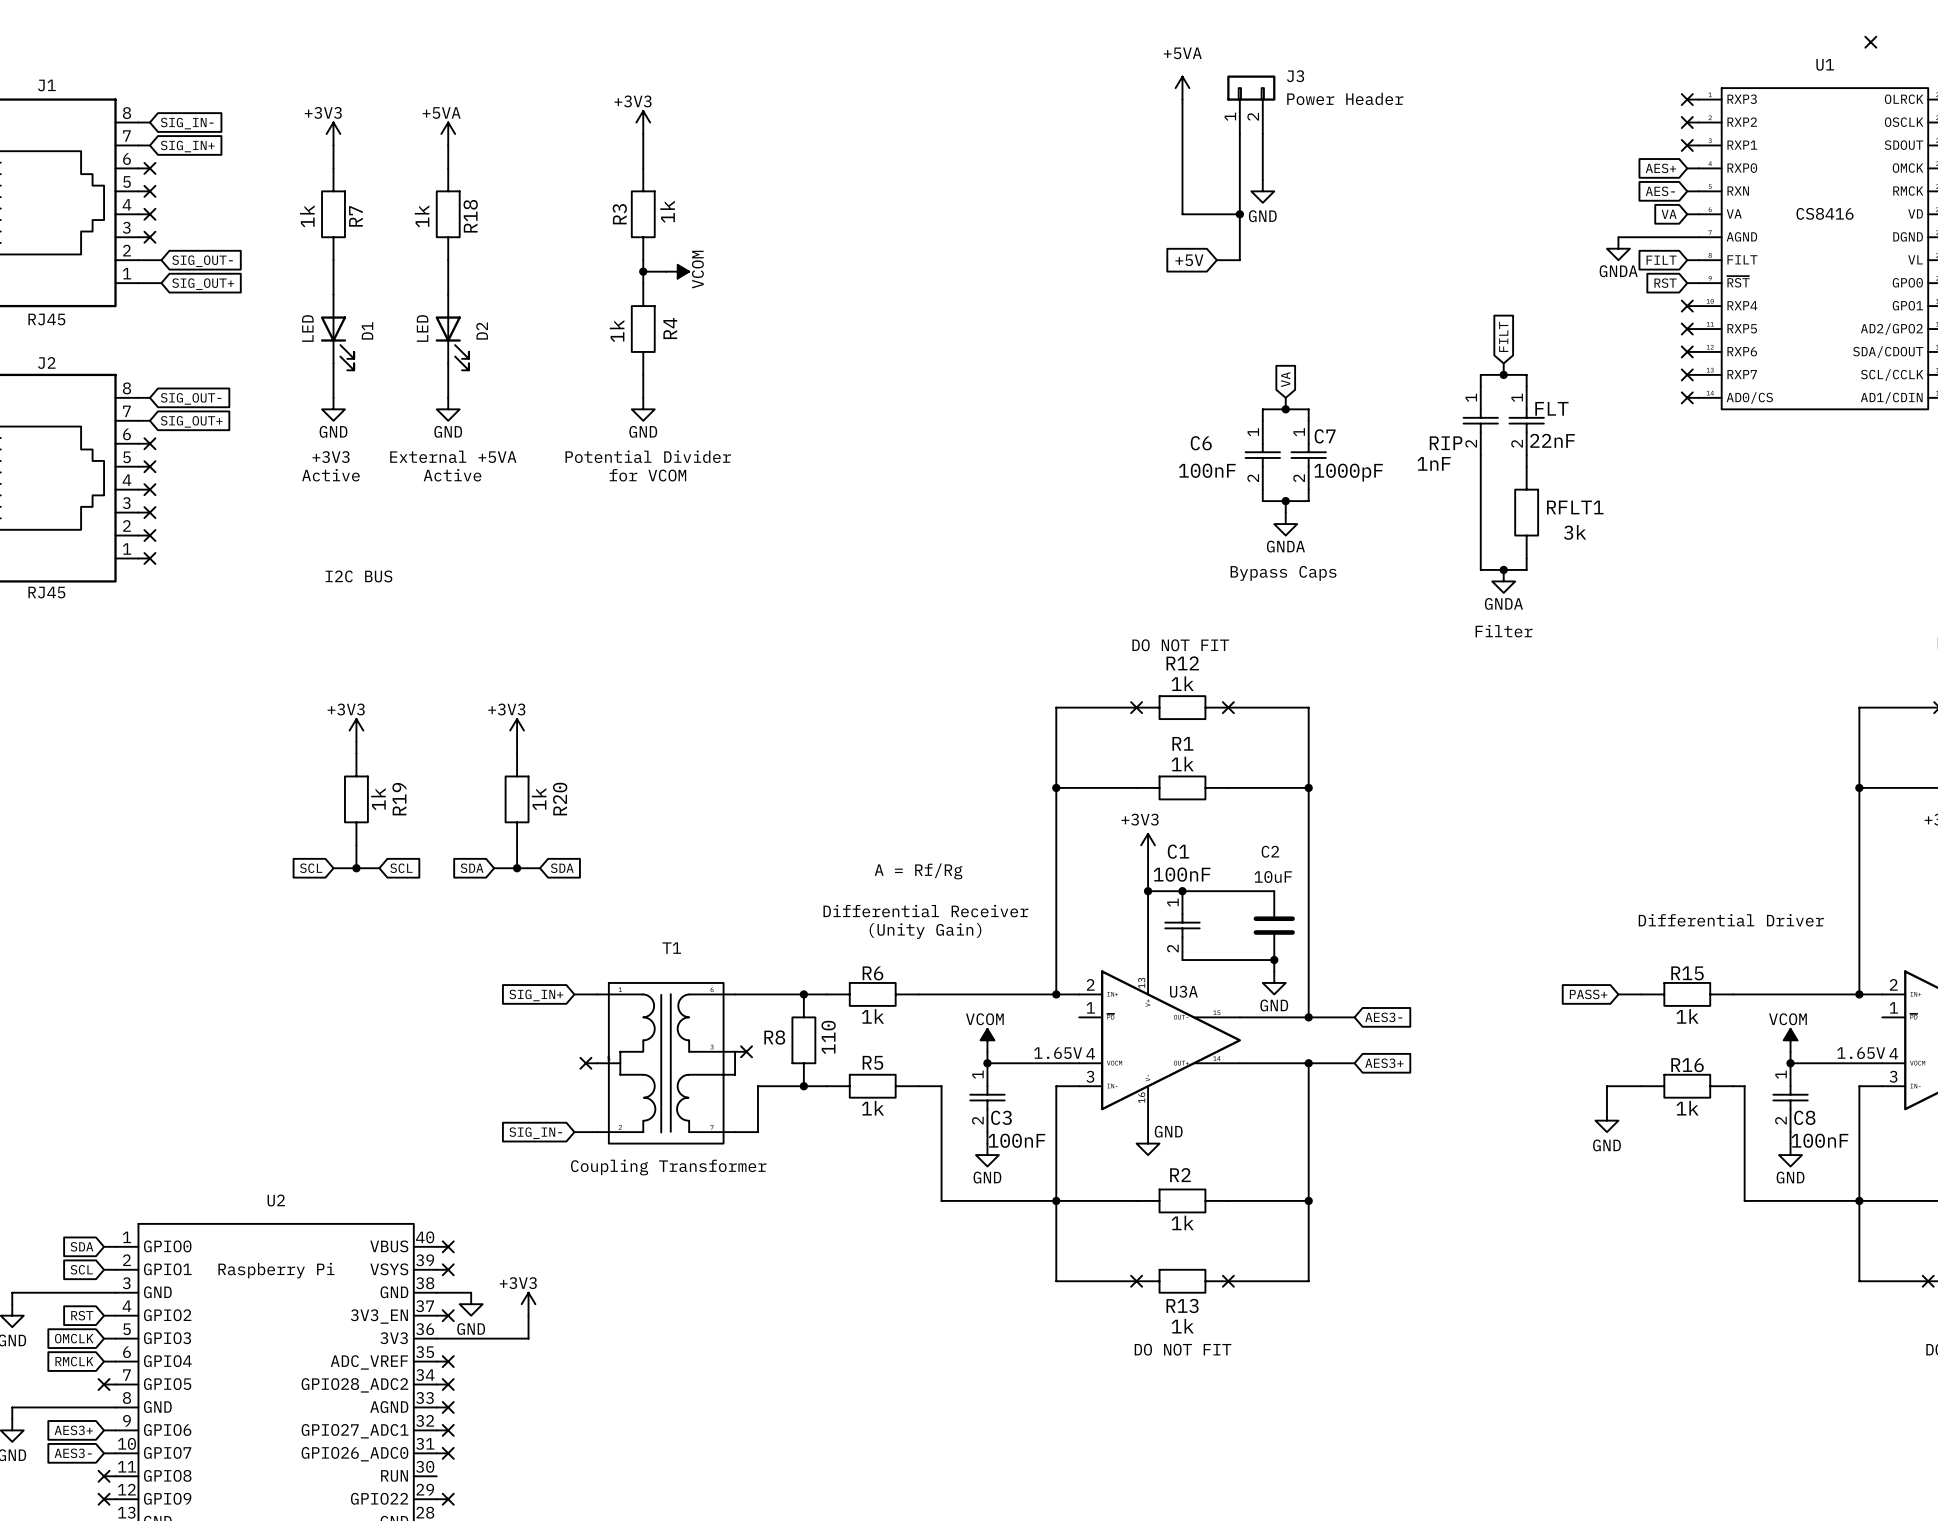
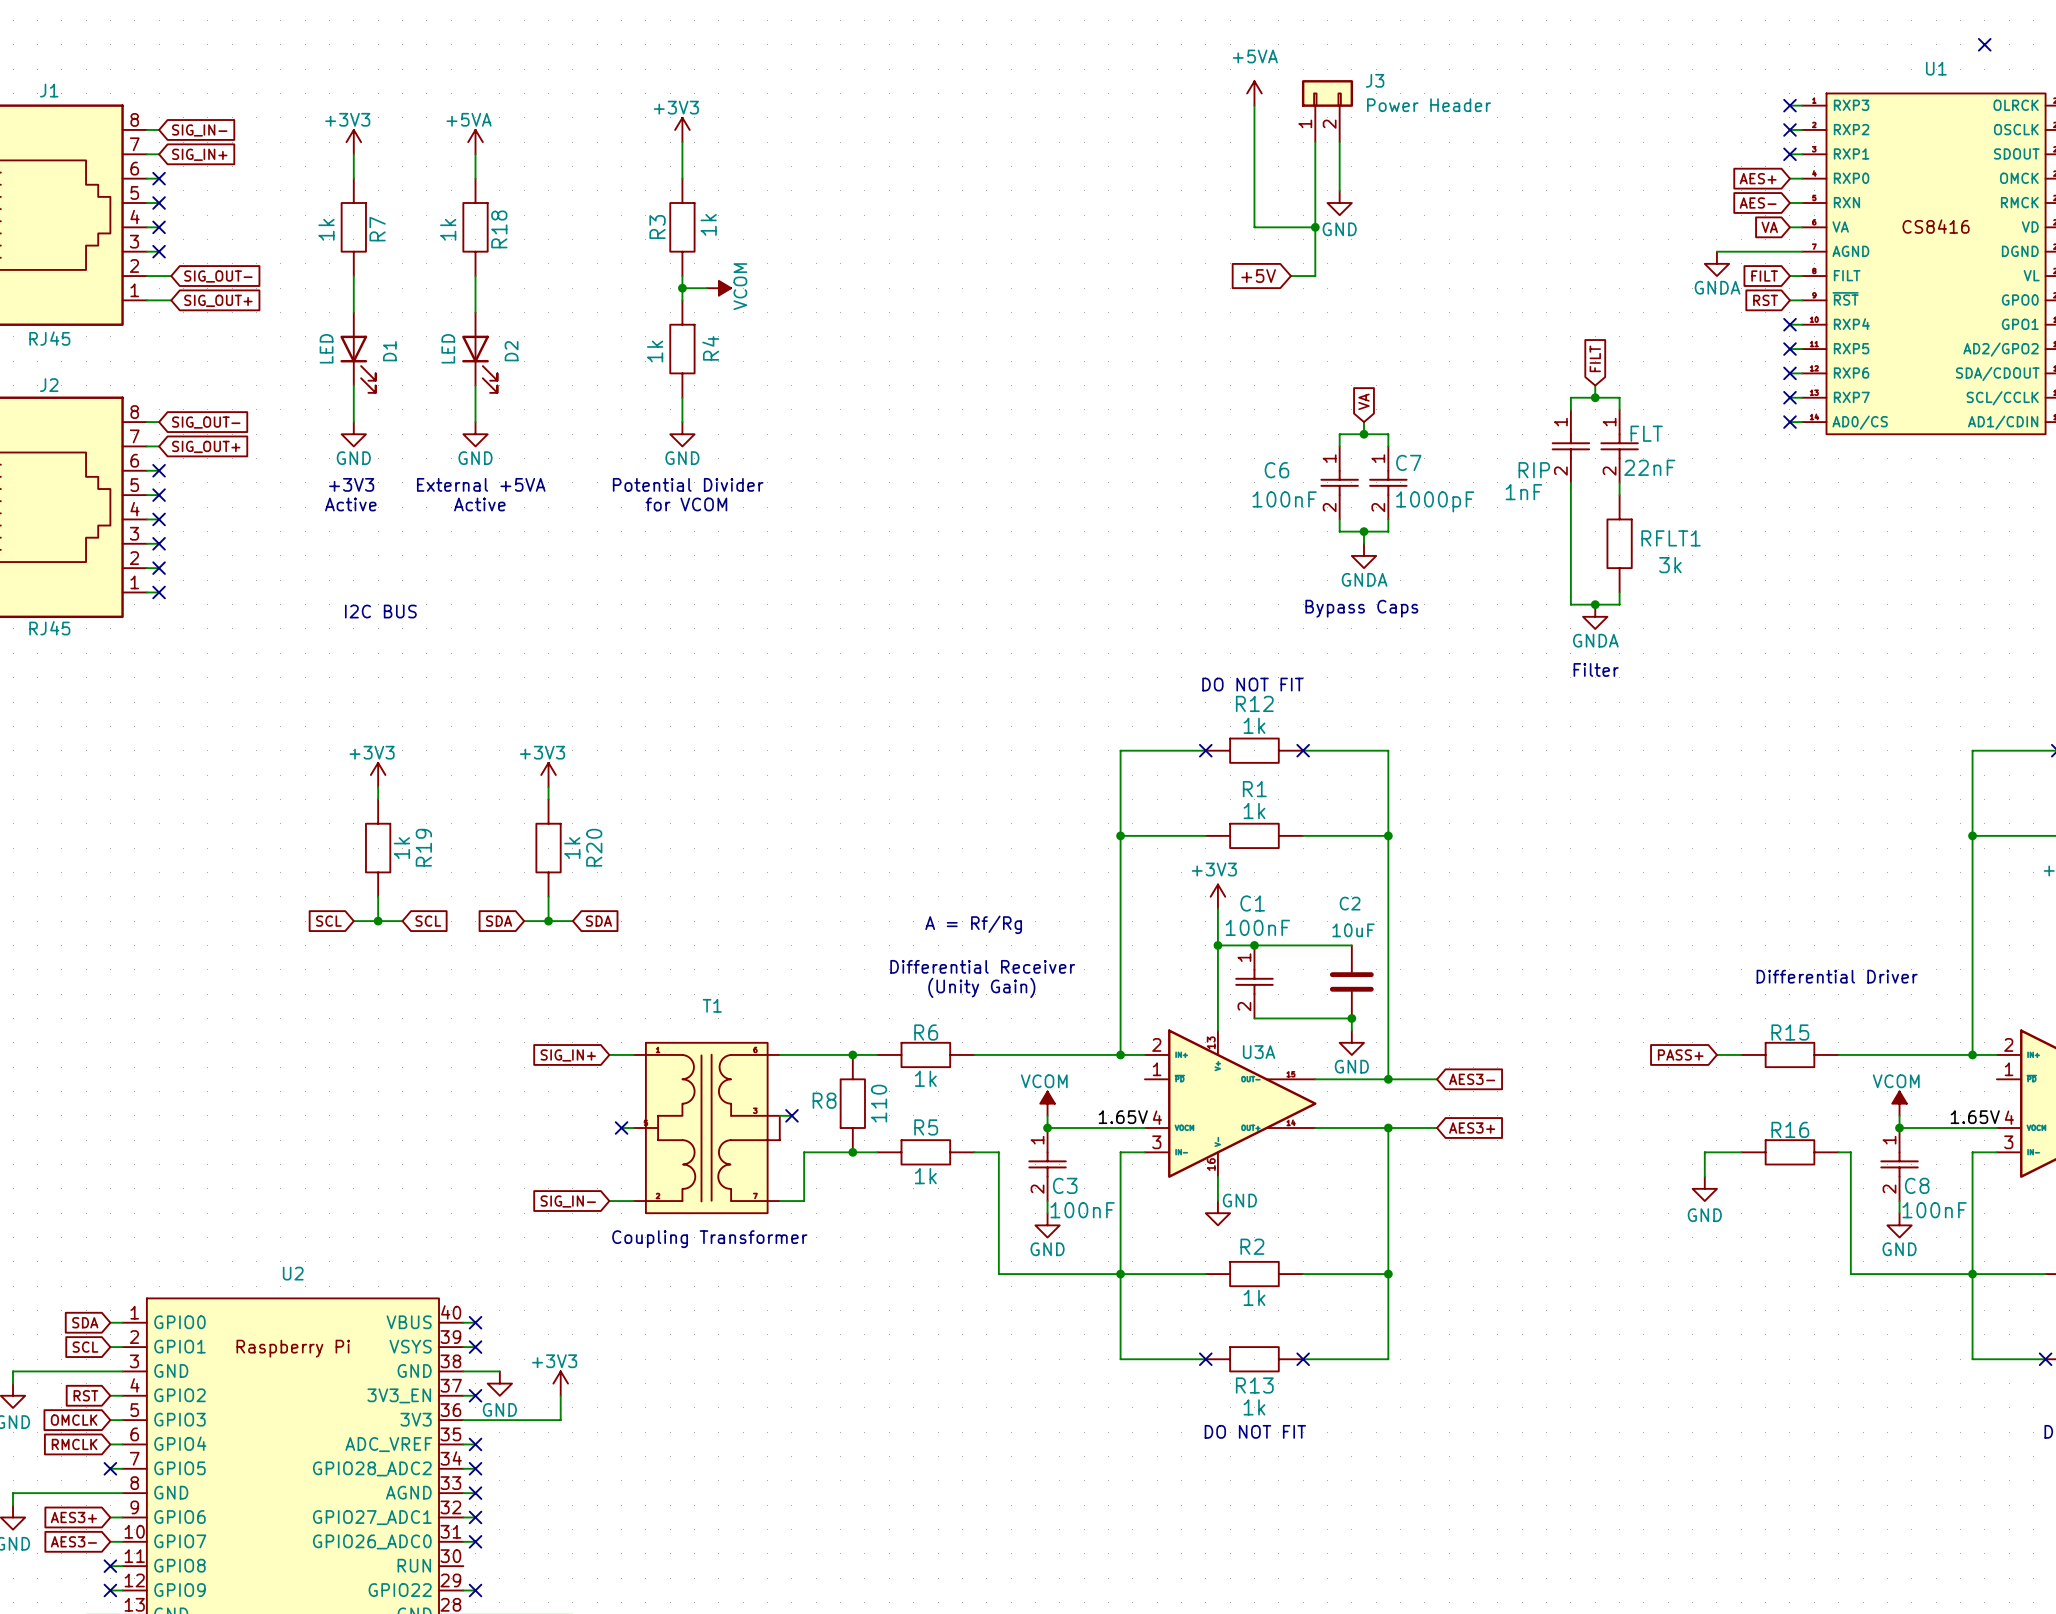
R15 value: 1k (1687, 1016) -> none
R16 value: 1k (1687, 1108) -> none

